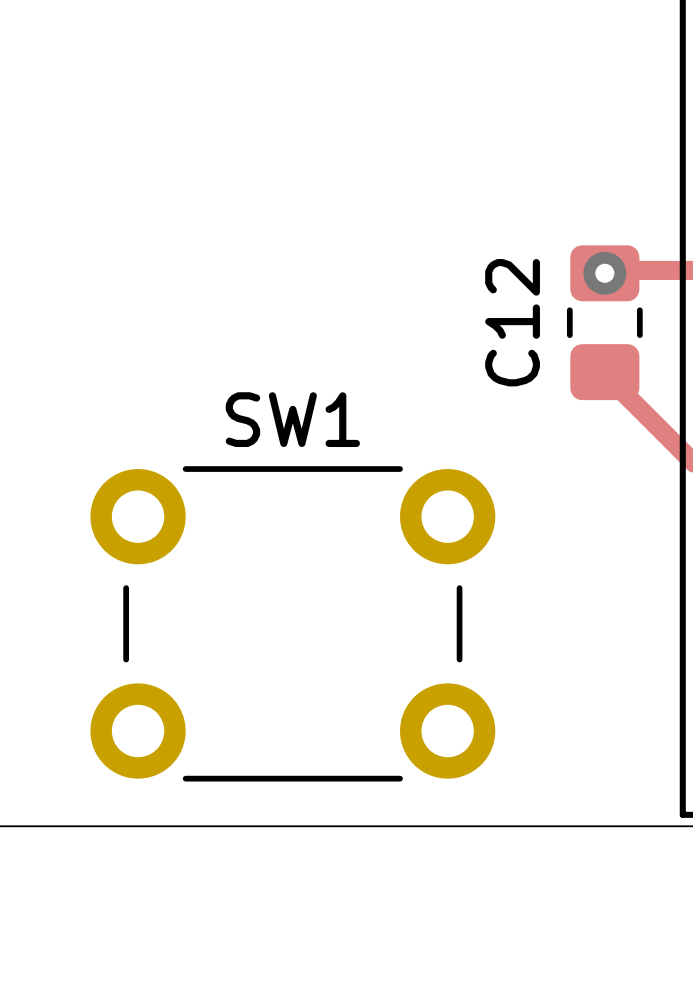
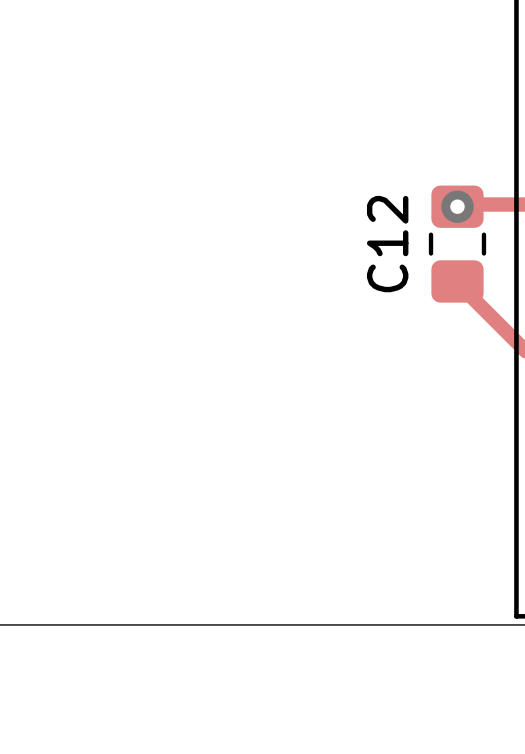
SW1: (292, 623) -> none

